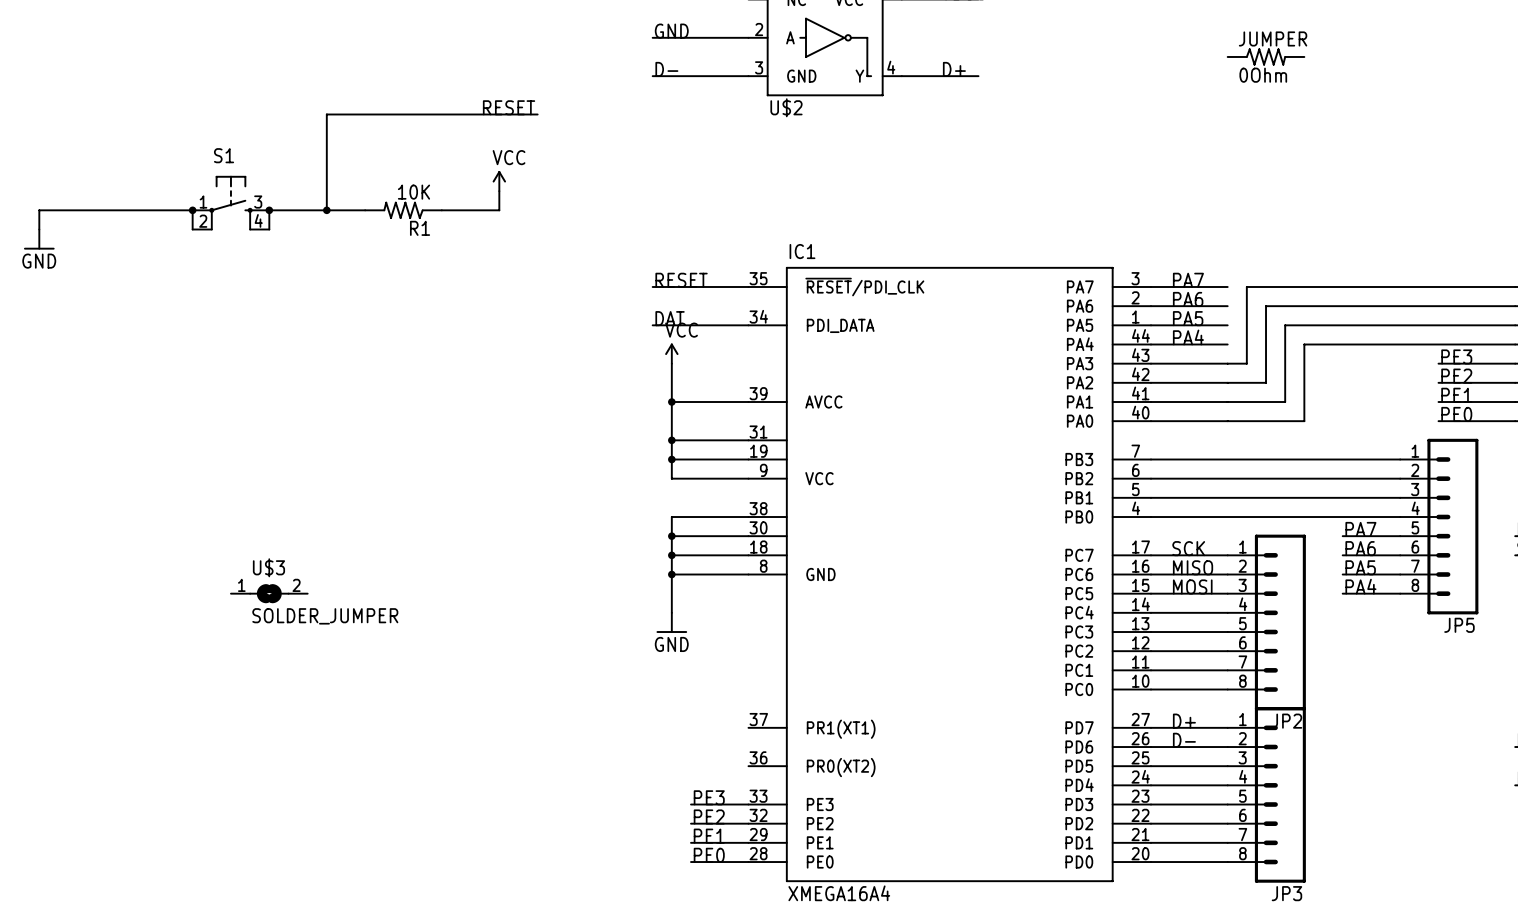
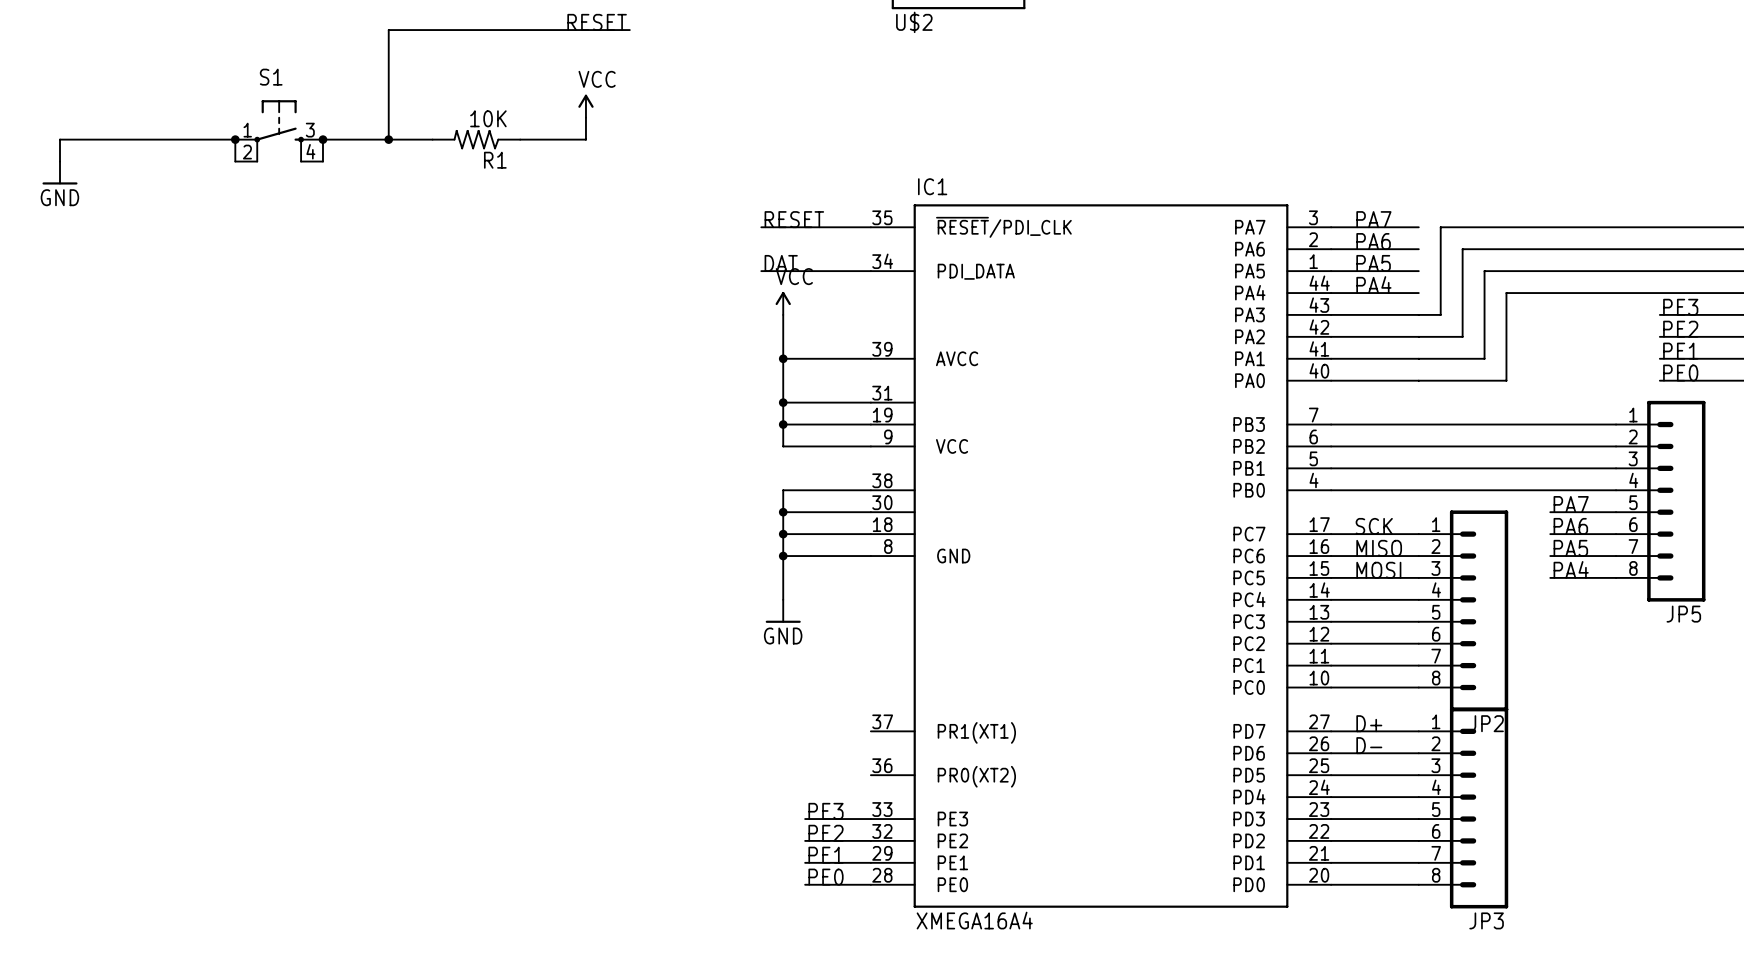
U$3: SOLDER_JUMPER (269, 593) -> none

